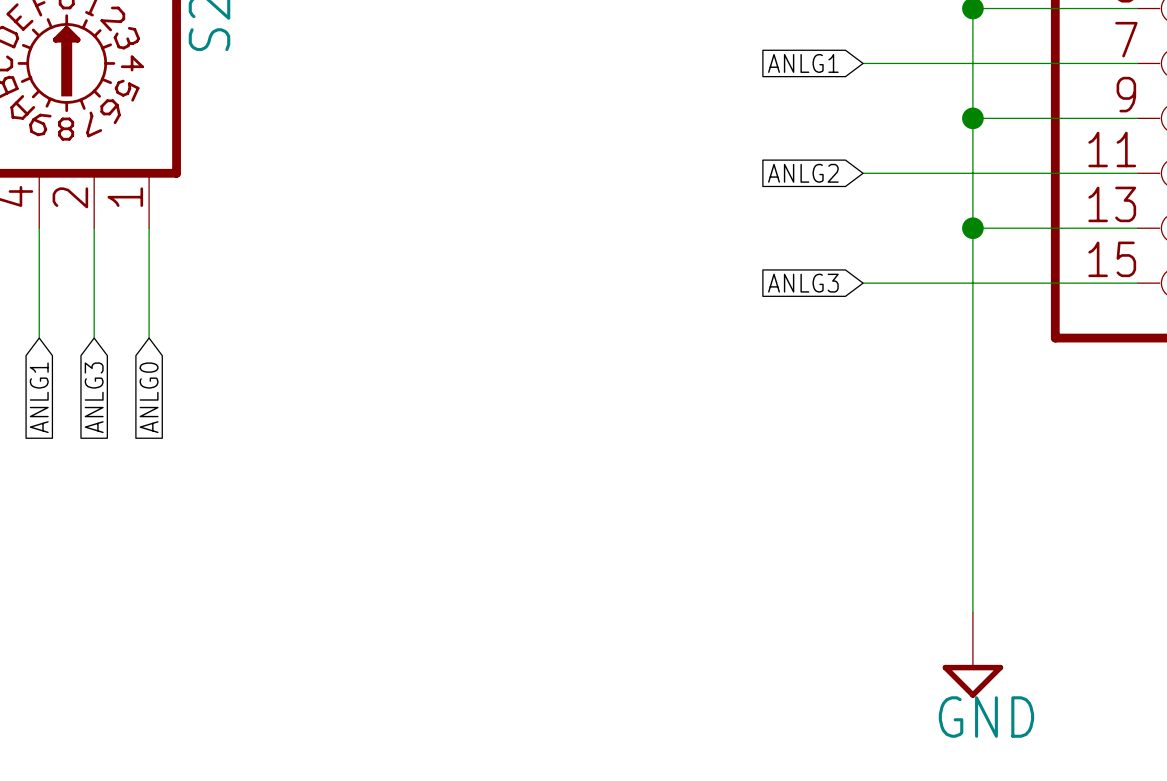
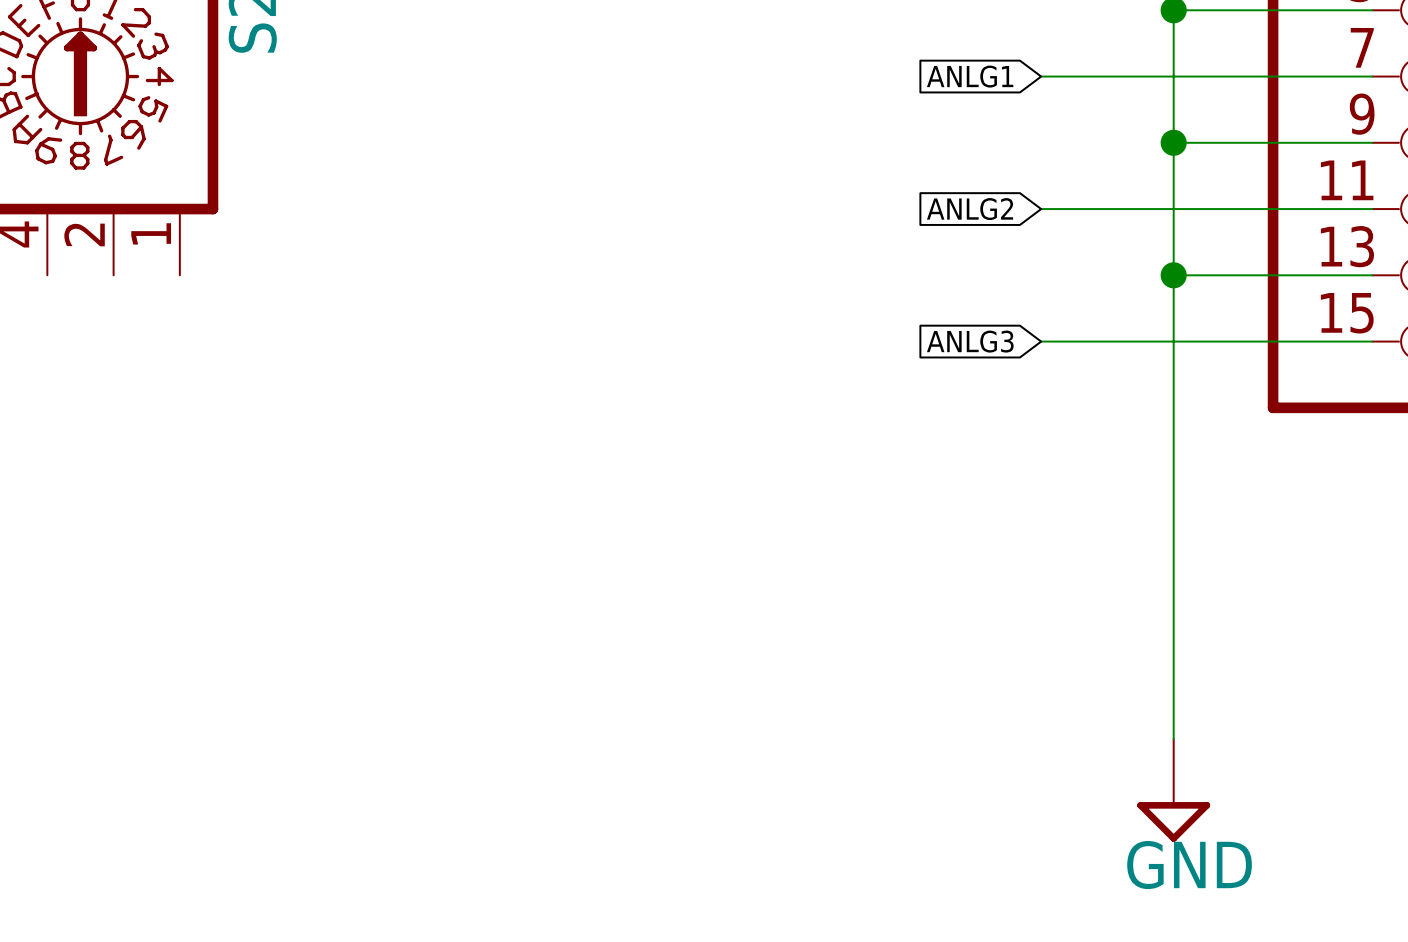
wire: (39, 228) (39, 338) -> none
wire: (94, 228) (94, 338) -> none
wire: (149, 228) (149, 338) -> none
global label: ANLG1 (39, 397) -> none
global label: ANLG3 (94, 397) -> none
global label: ANLG0 (149, 397) -> none

